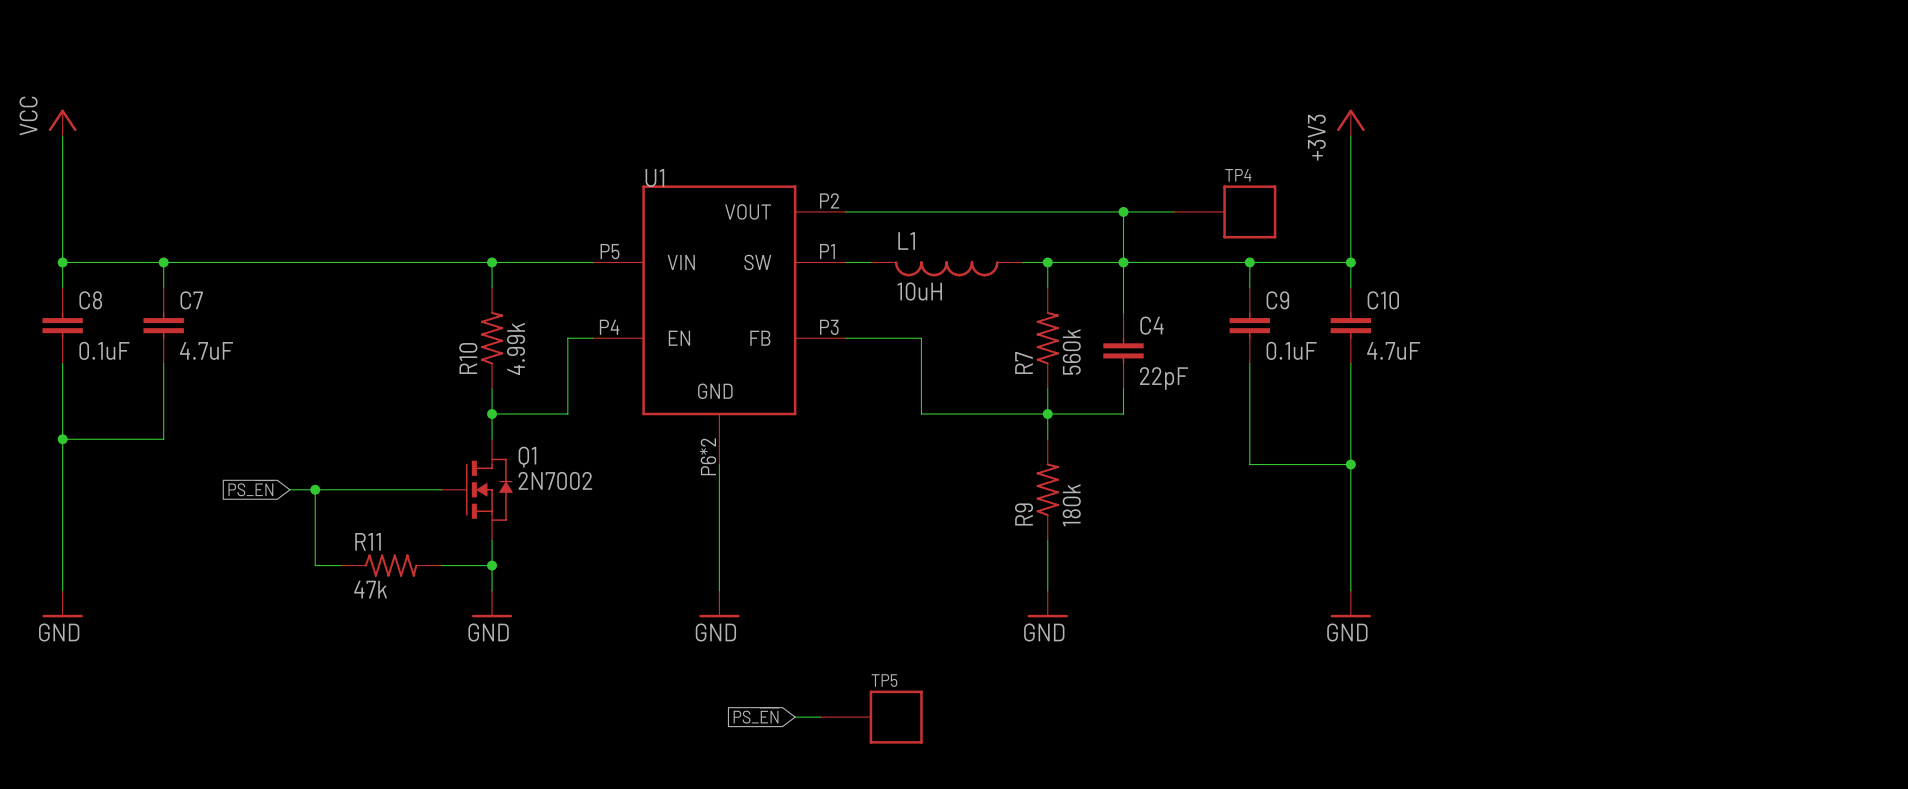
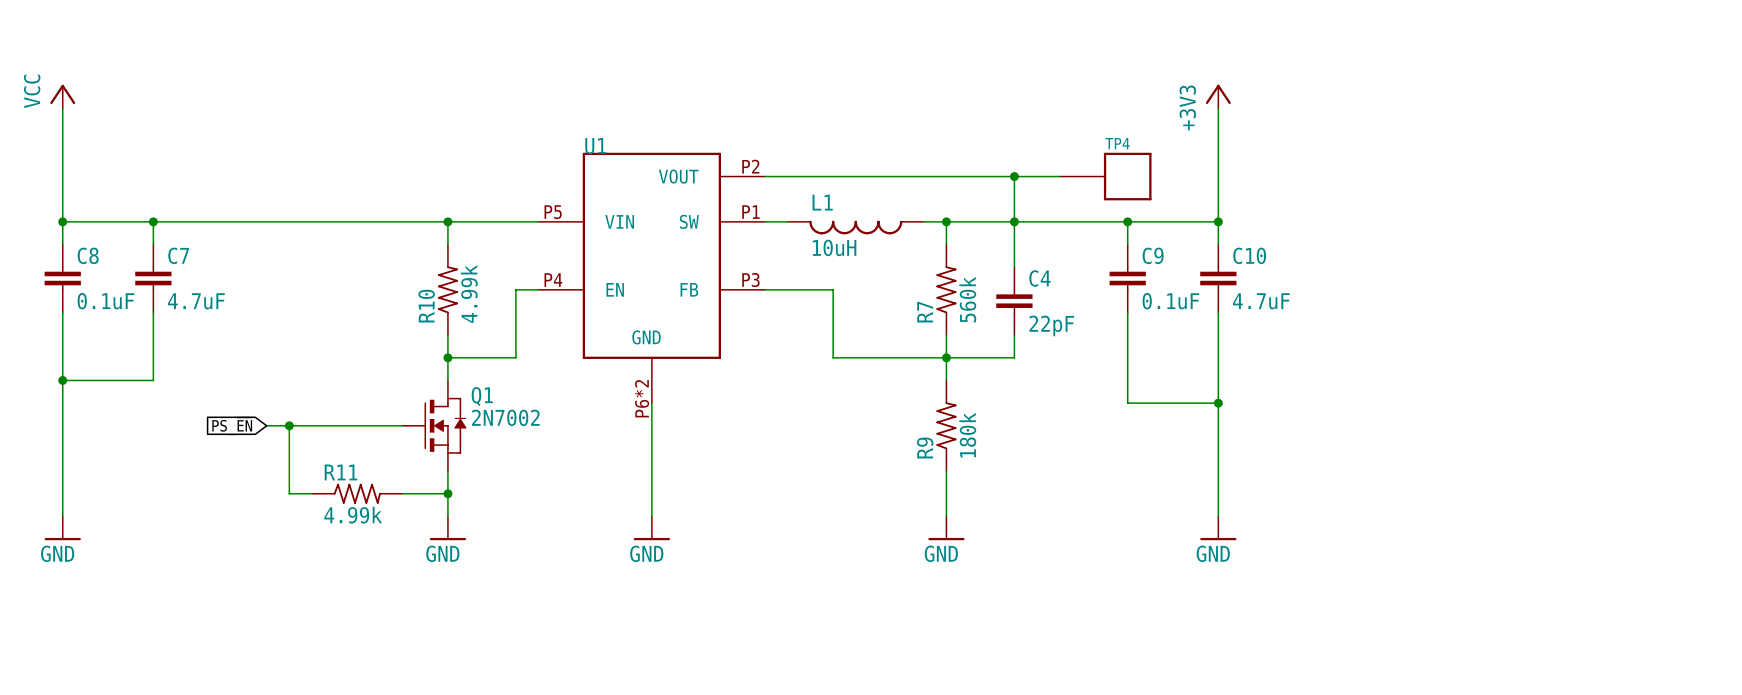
R11 value: 47k (370, 589) -> 4.99k (353, 515)
global label: PS_~{EN} (756, 715) -> none
wire: (795, 717) (820, 717) -> none
TP5: (871, 717) -> none

